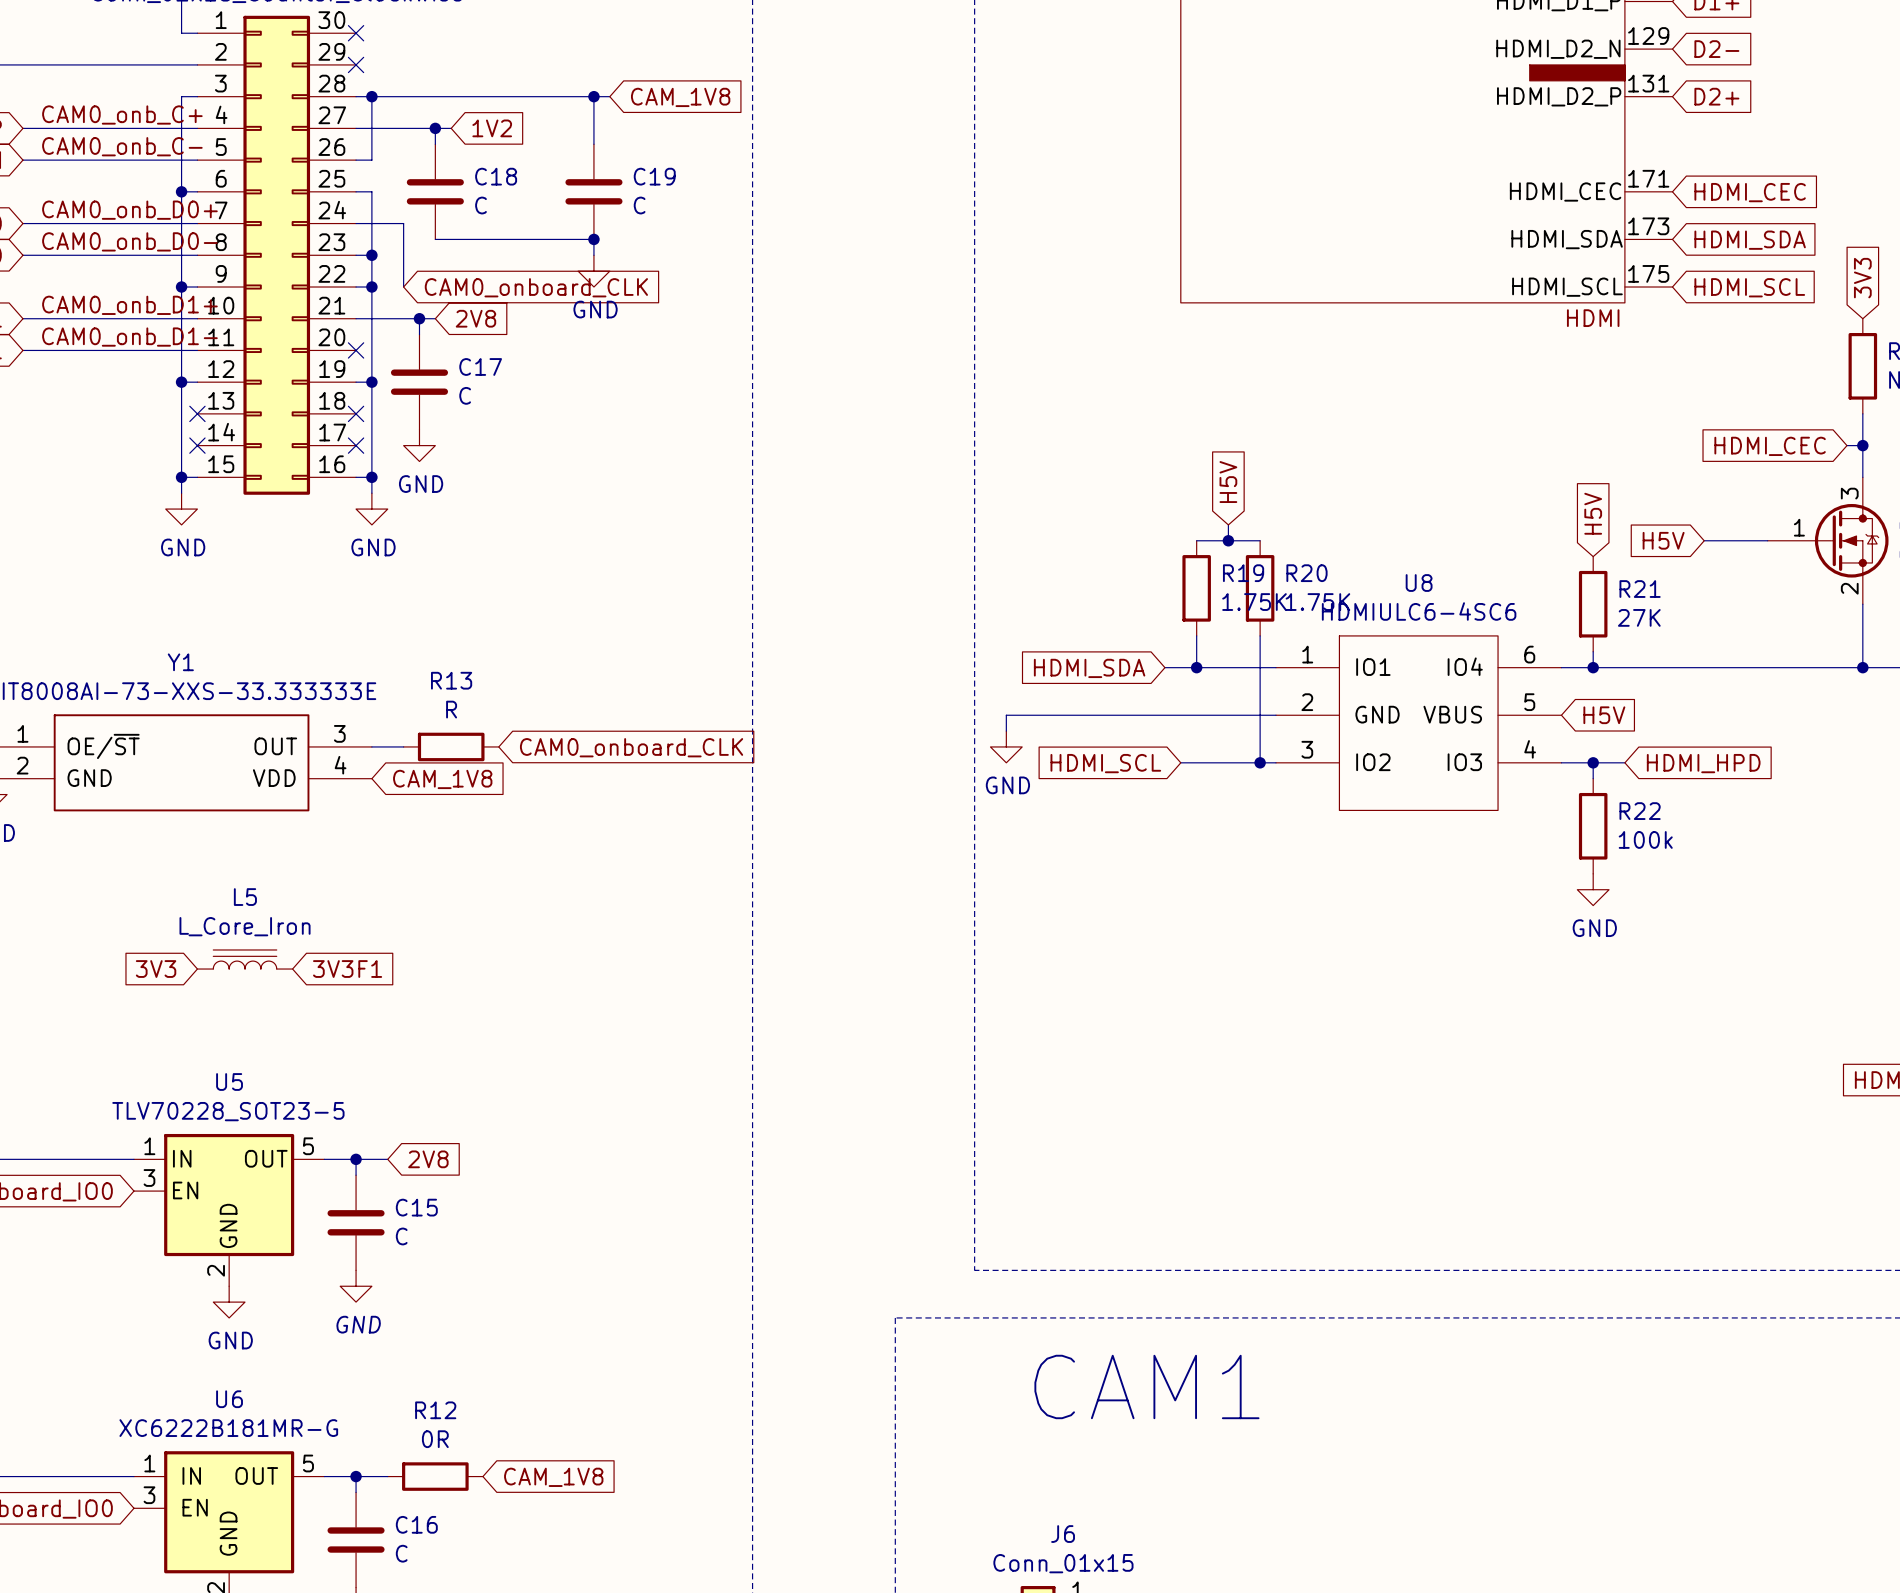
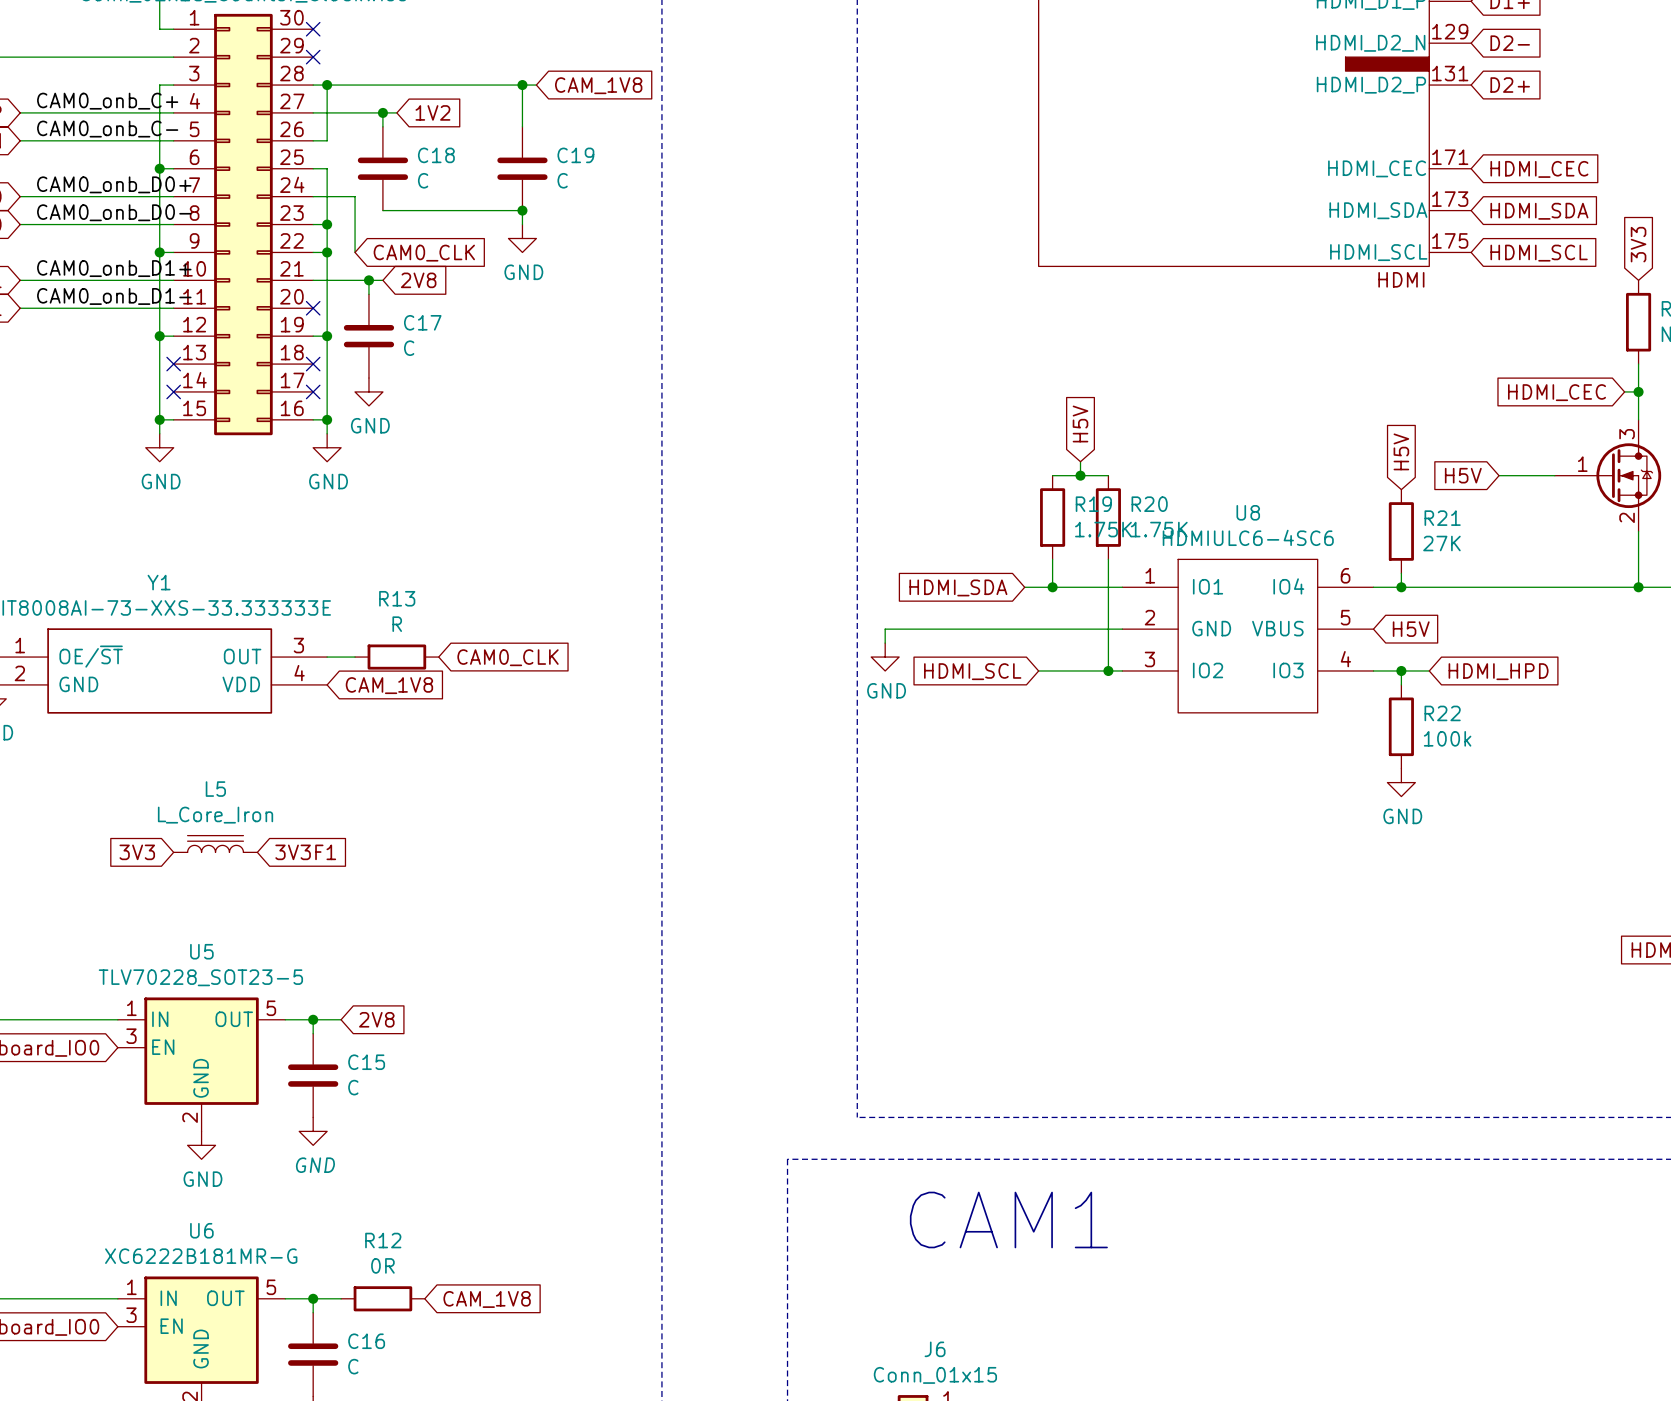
global label: CAM0_onboard_CLK (536, 287) -> CAM0_CLK (424, 253)
global label: CAM0_onboard_CLK (631, 747) -> CAM0_CLK (508, 657)

